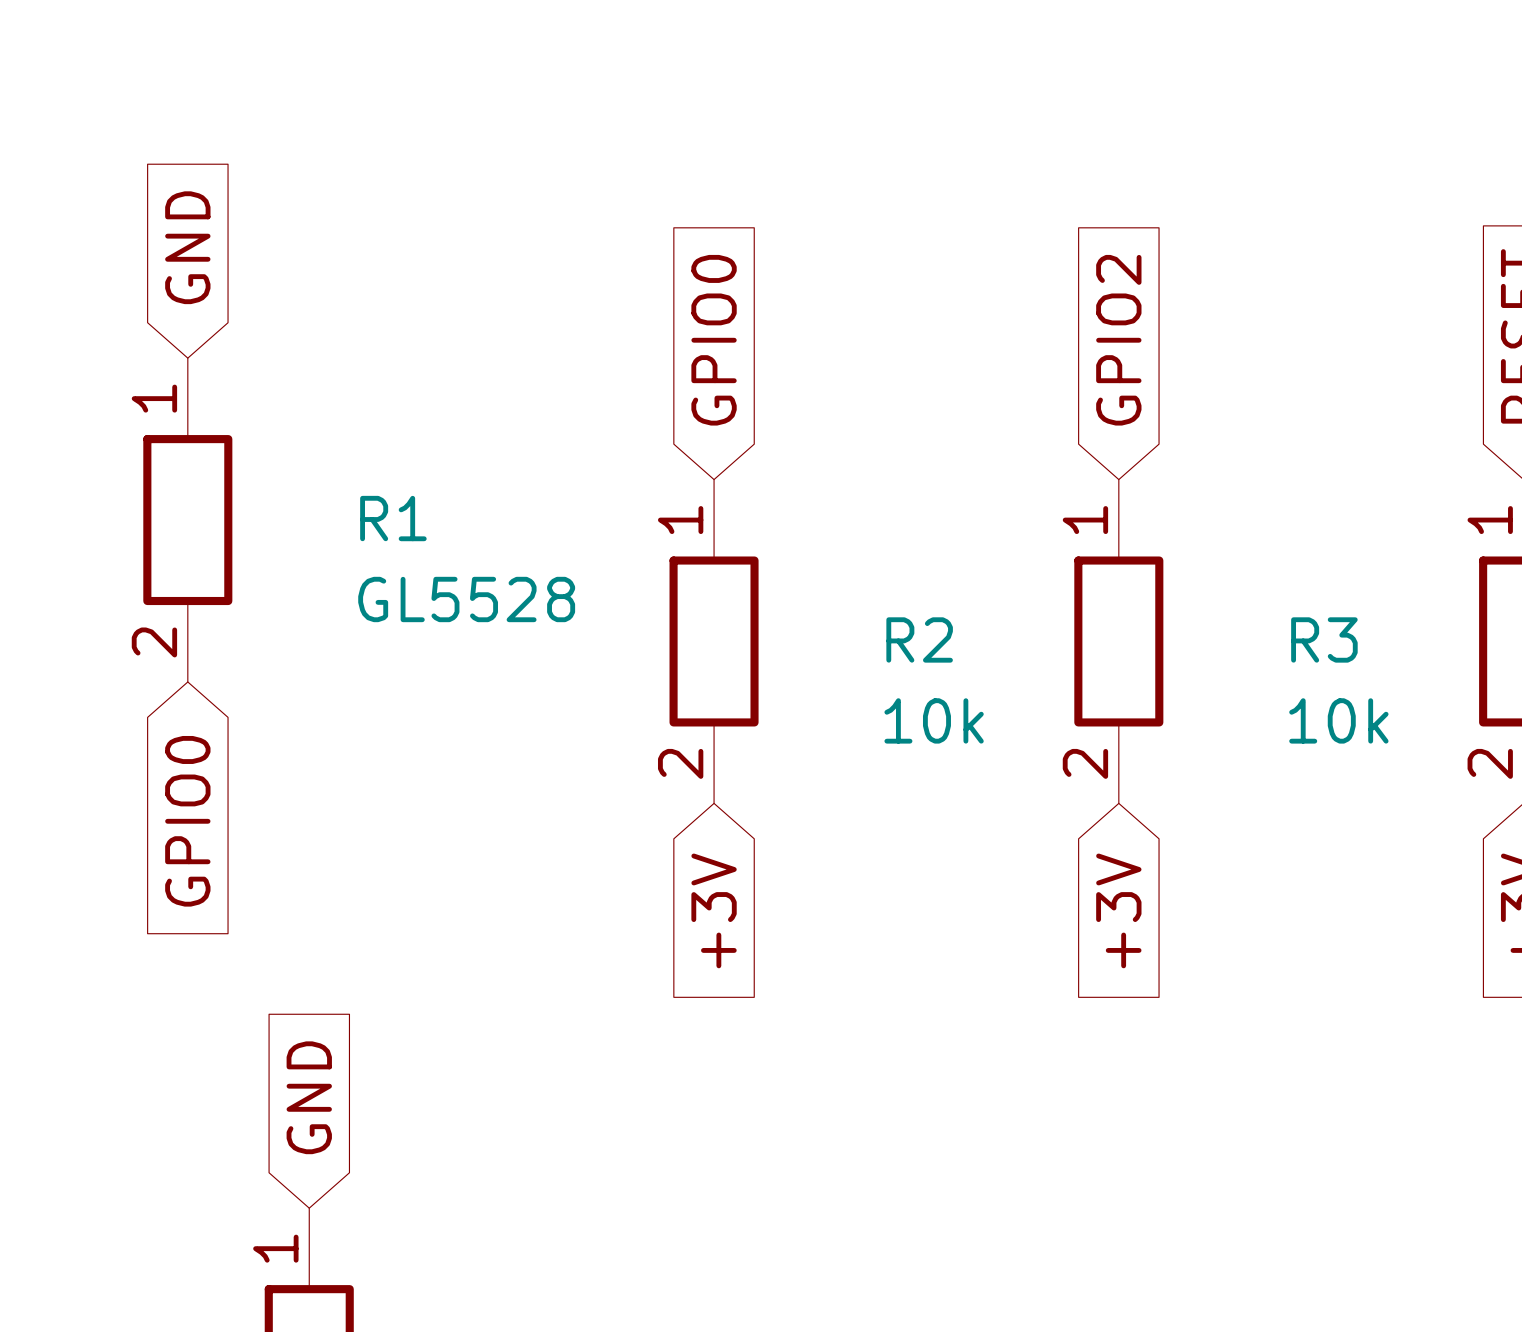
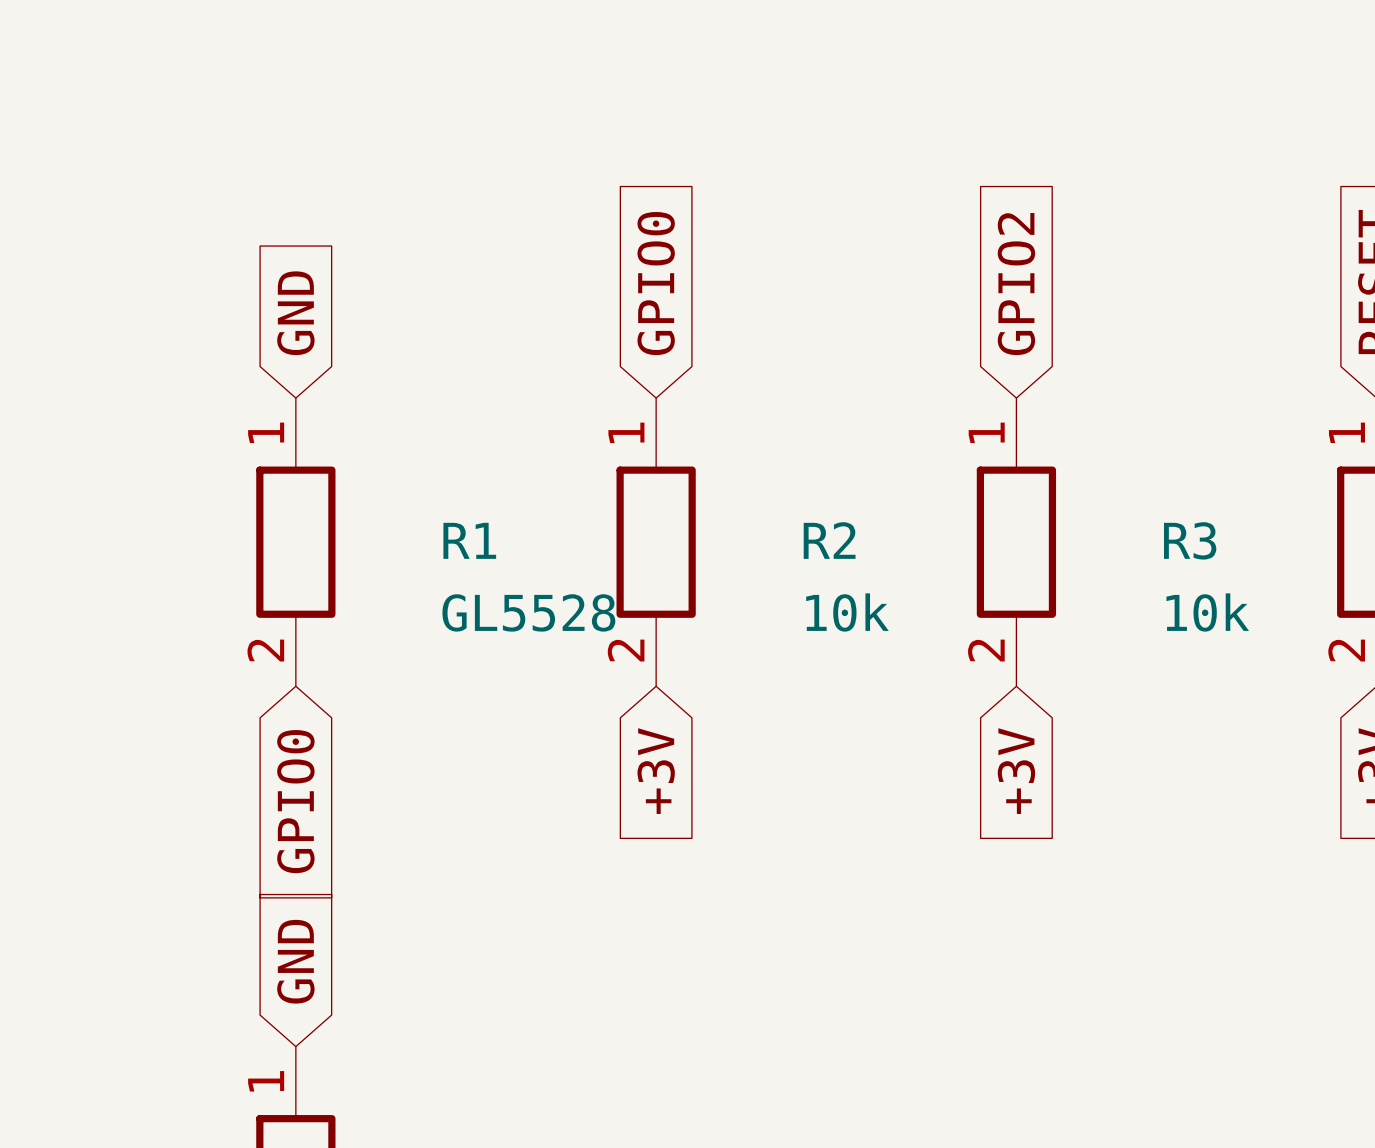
global label position: GND (187, 247) -> GND (295, 313)
R1 position: (187, 520) -> (295, 542)
global label position: GPIO0 (187, 821) -> GPIO0 (295, 801)

